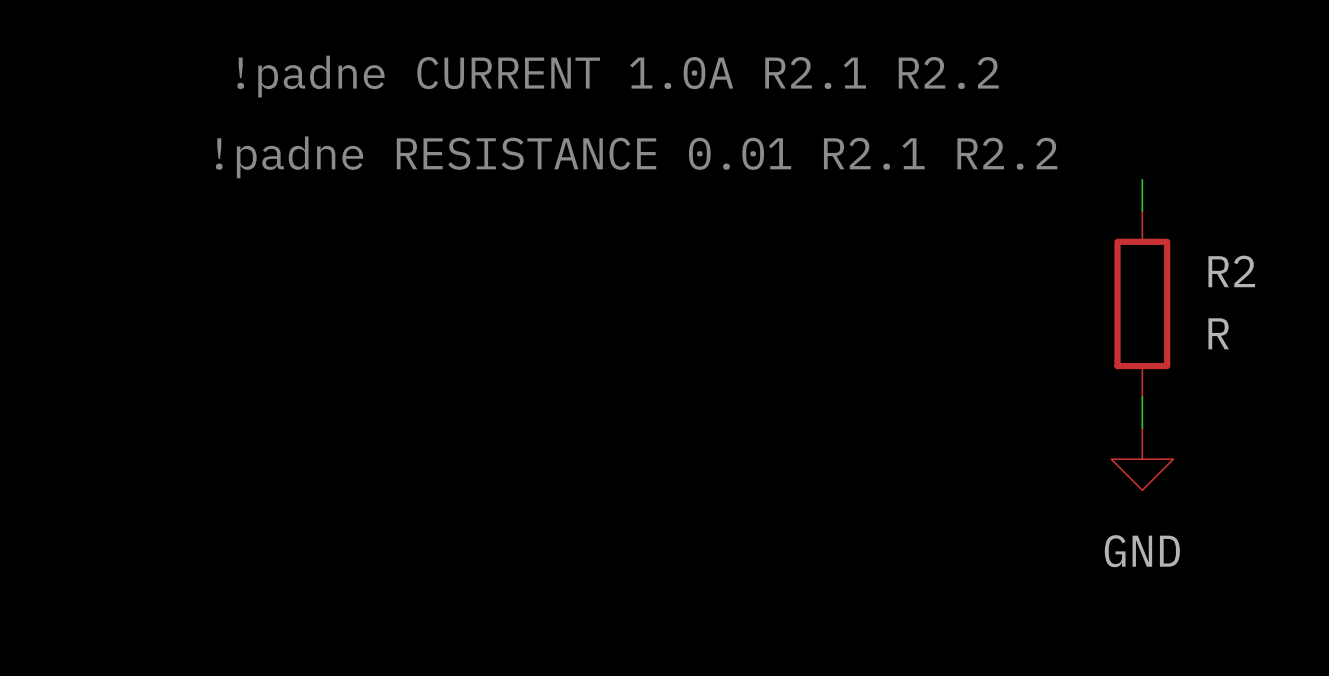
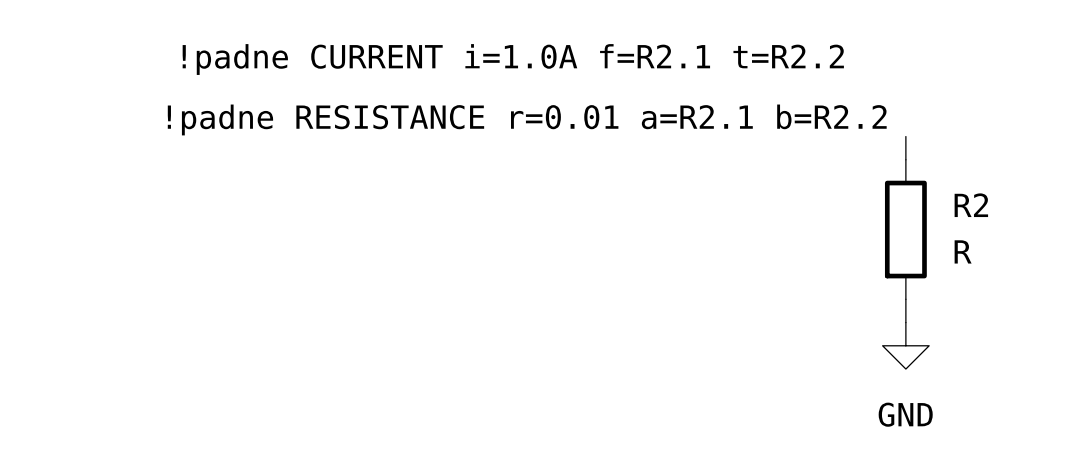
text: !padne CURRENT 1.0A R2.1 R2.2 (618, 76) -> !padne CURRENT i=1.0A f=R2.1 t=R2.2 (513, 59)
text: !padne RESISTANCE 0.01 R2.1 R2.2 (636, 157) -> !padne RESISTANCE r=0.01 a=R2.1 b=R2.2 (527, 119)

